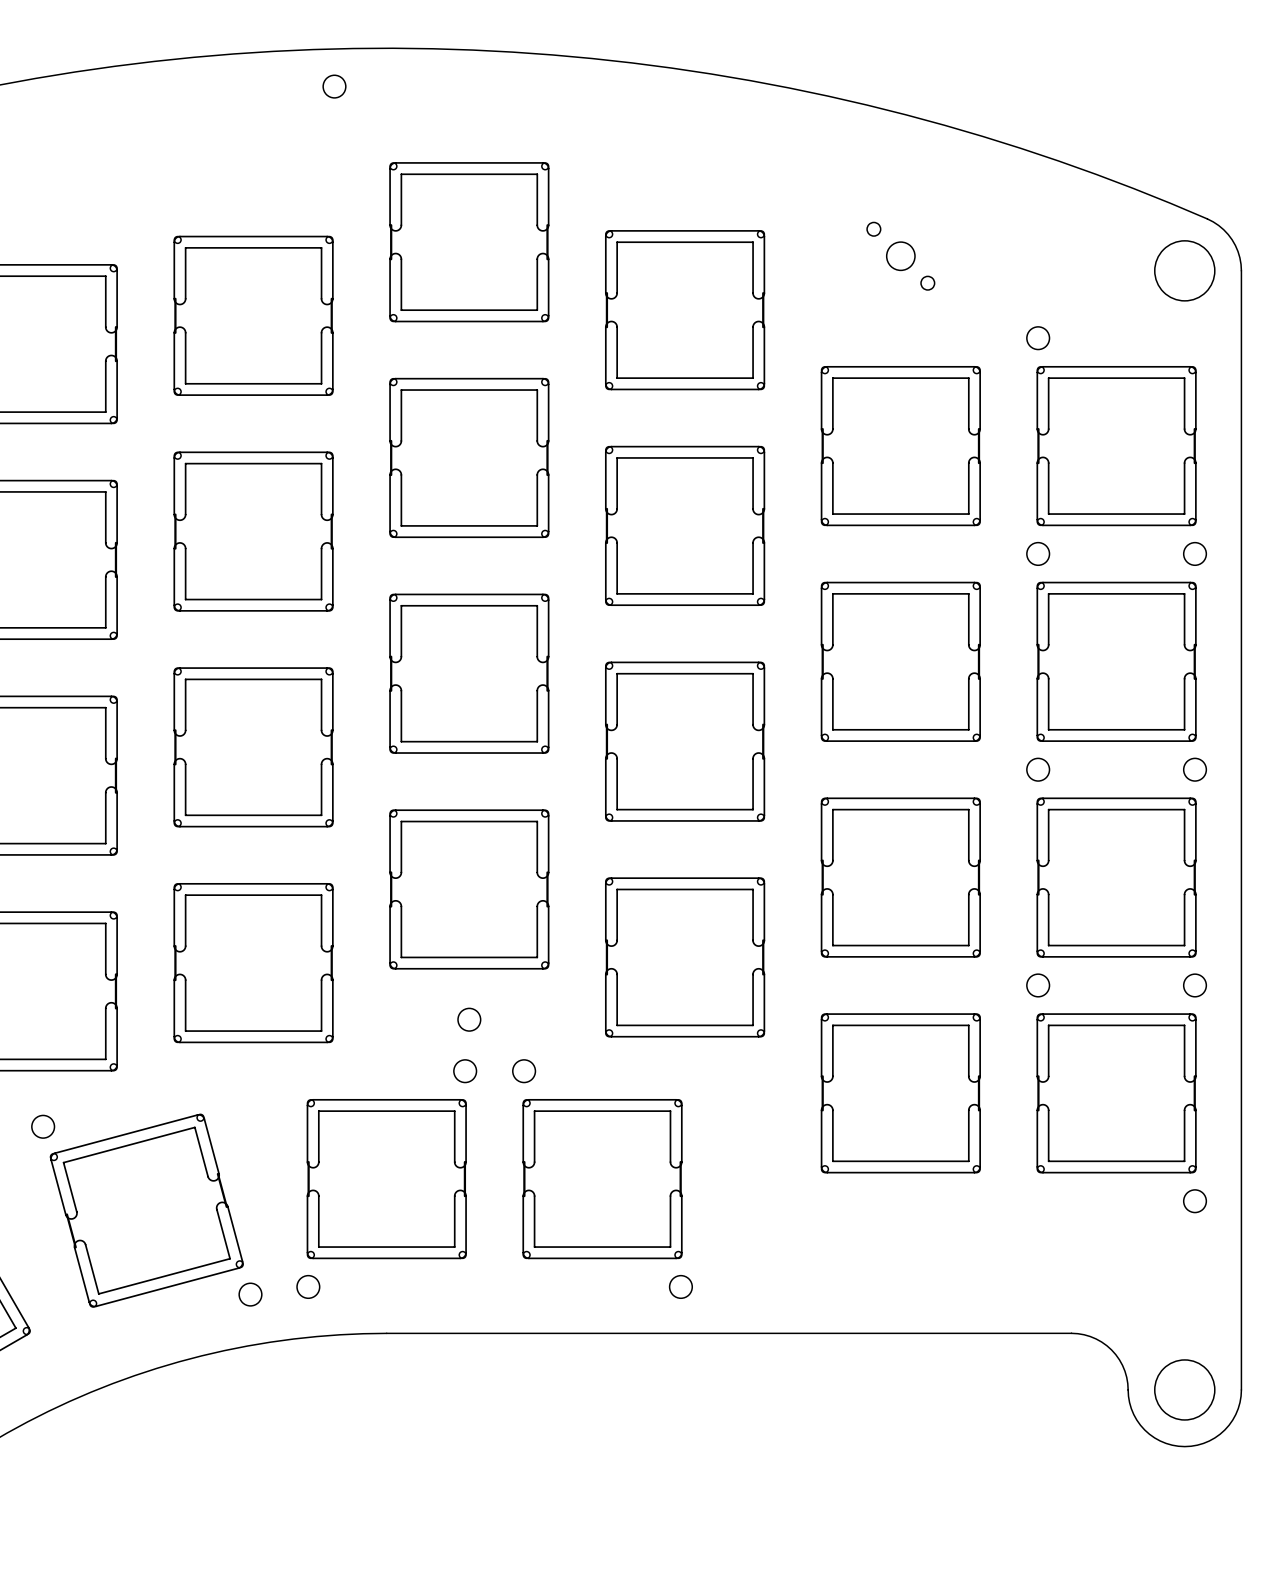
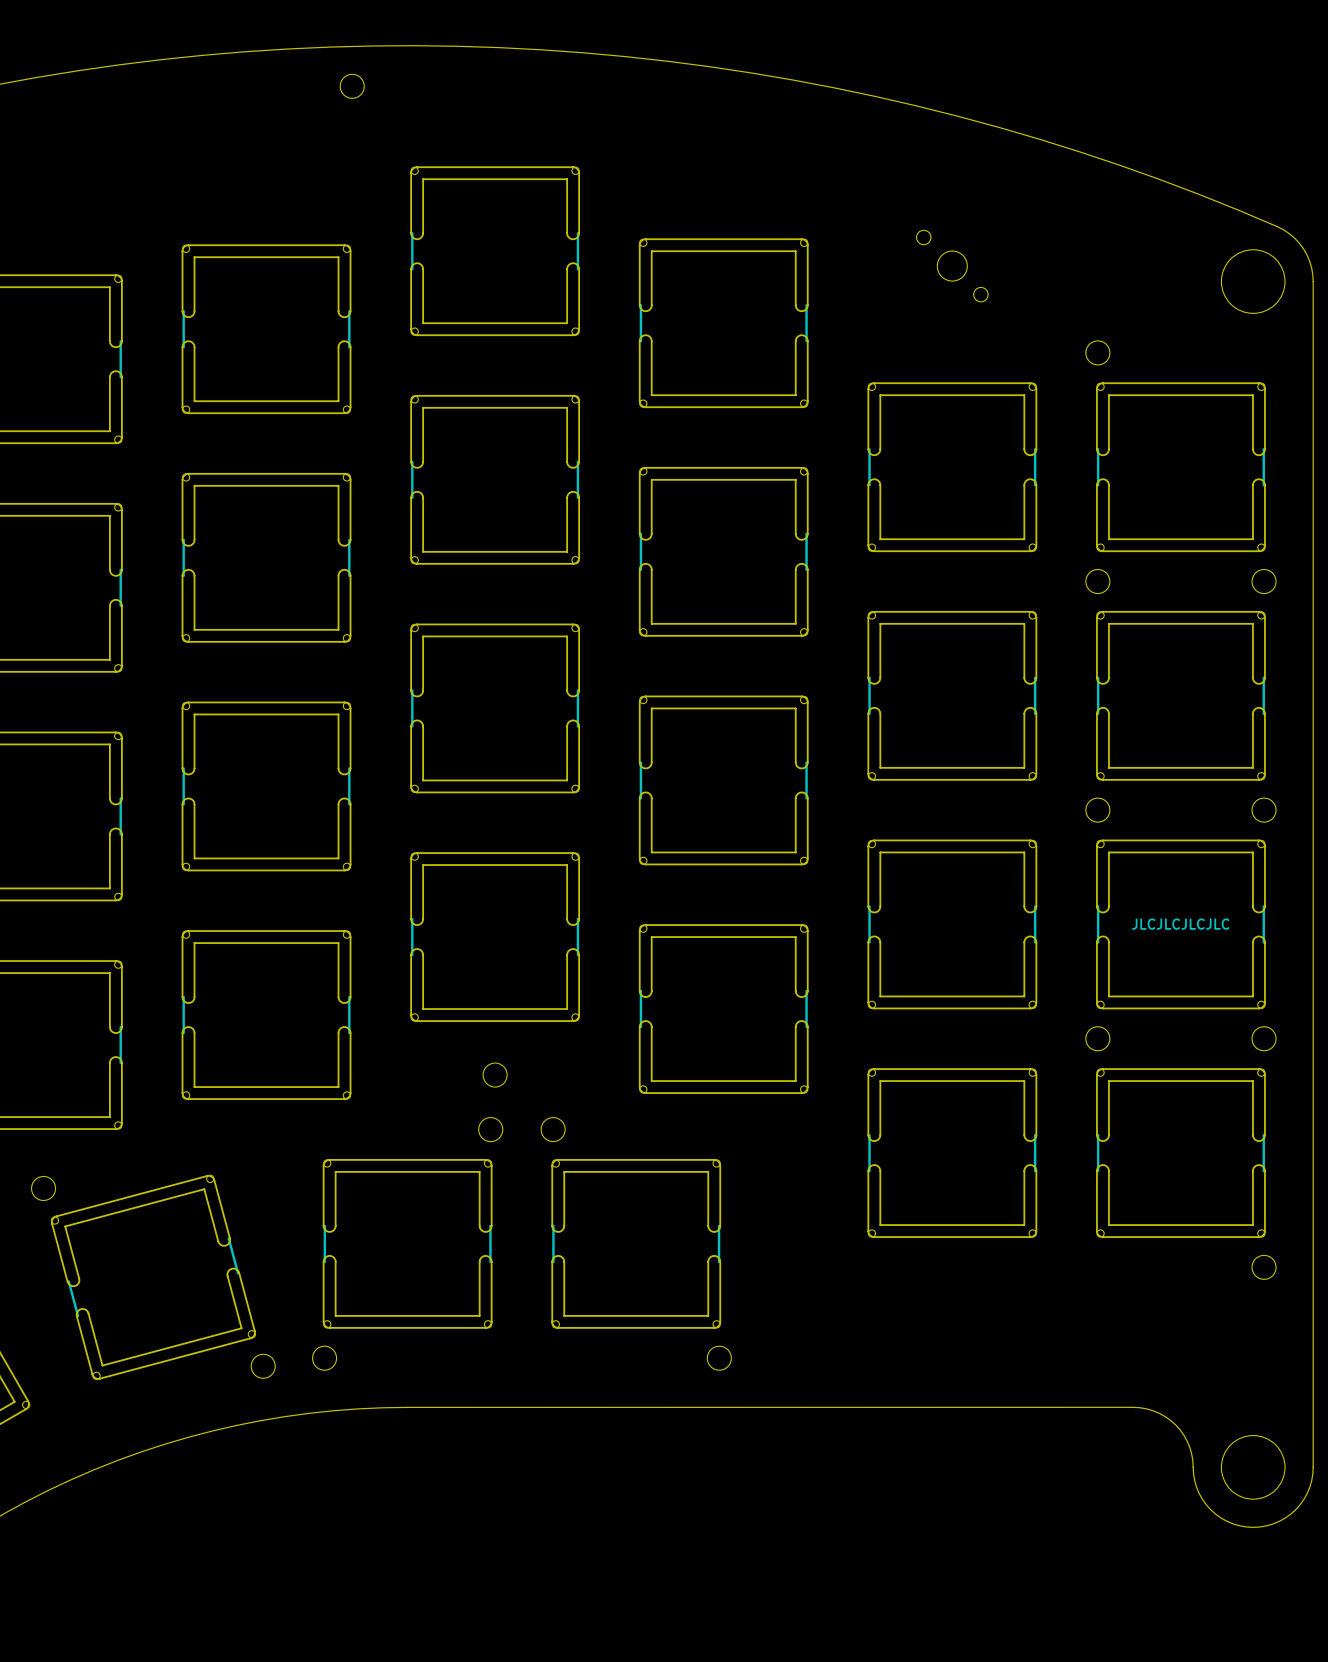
JLCJLCJLCJLC: none -> (1180, 924)

